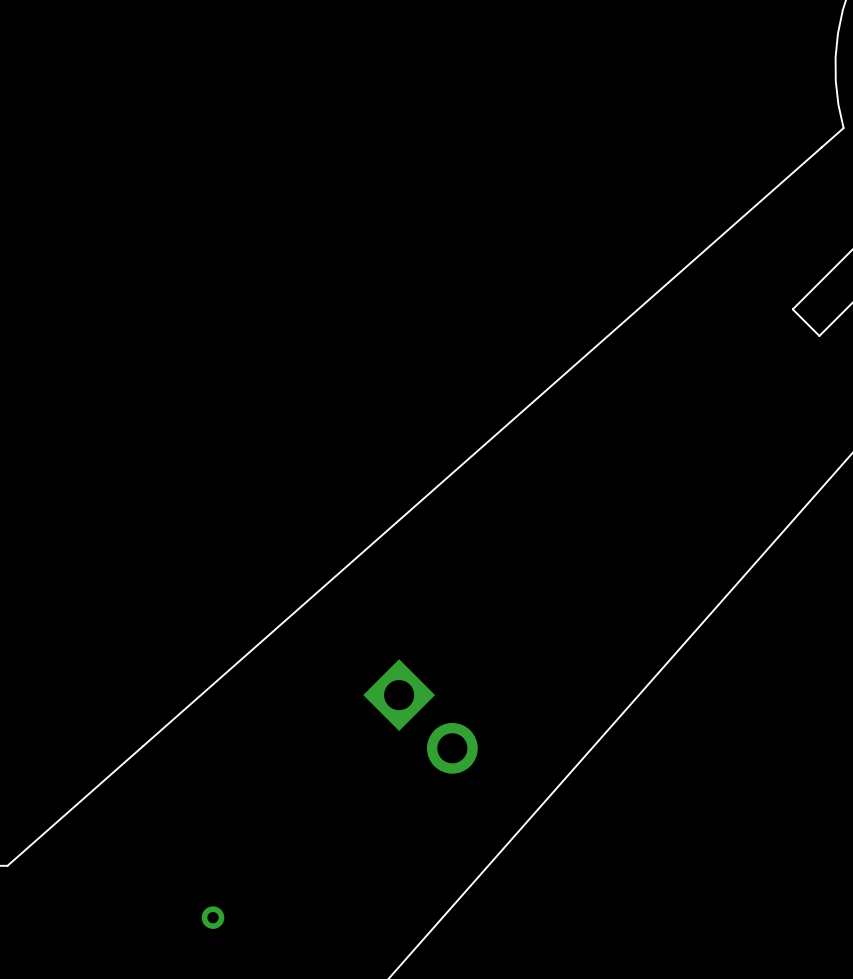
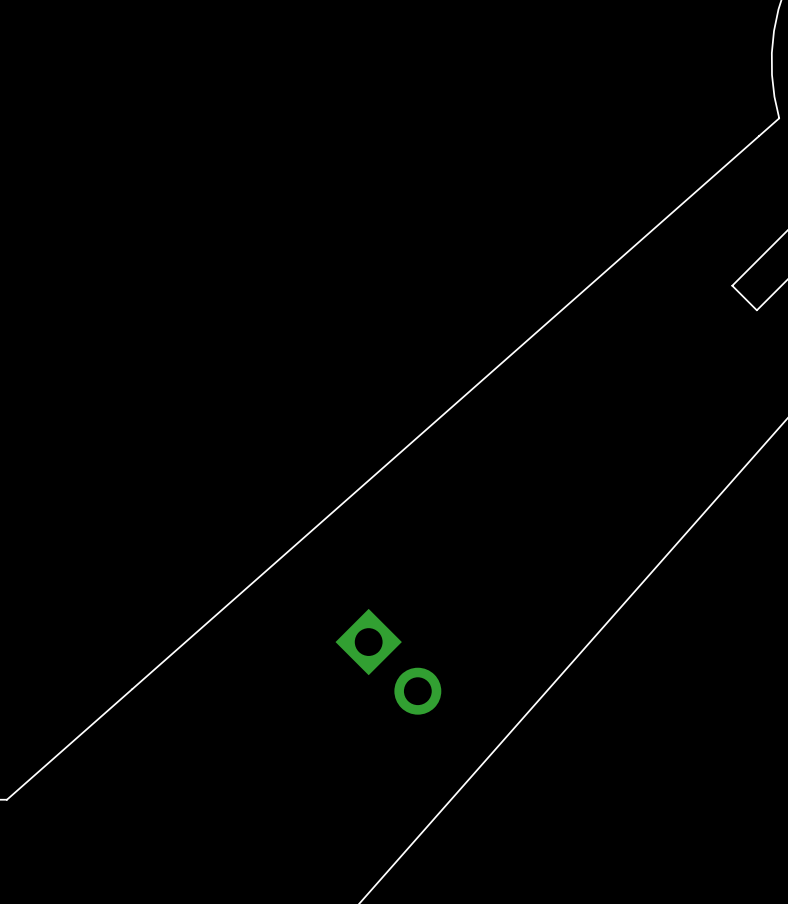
via: (213, 917) -> none

